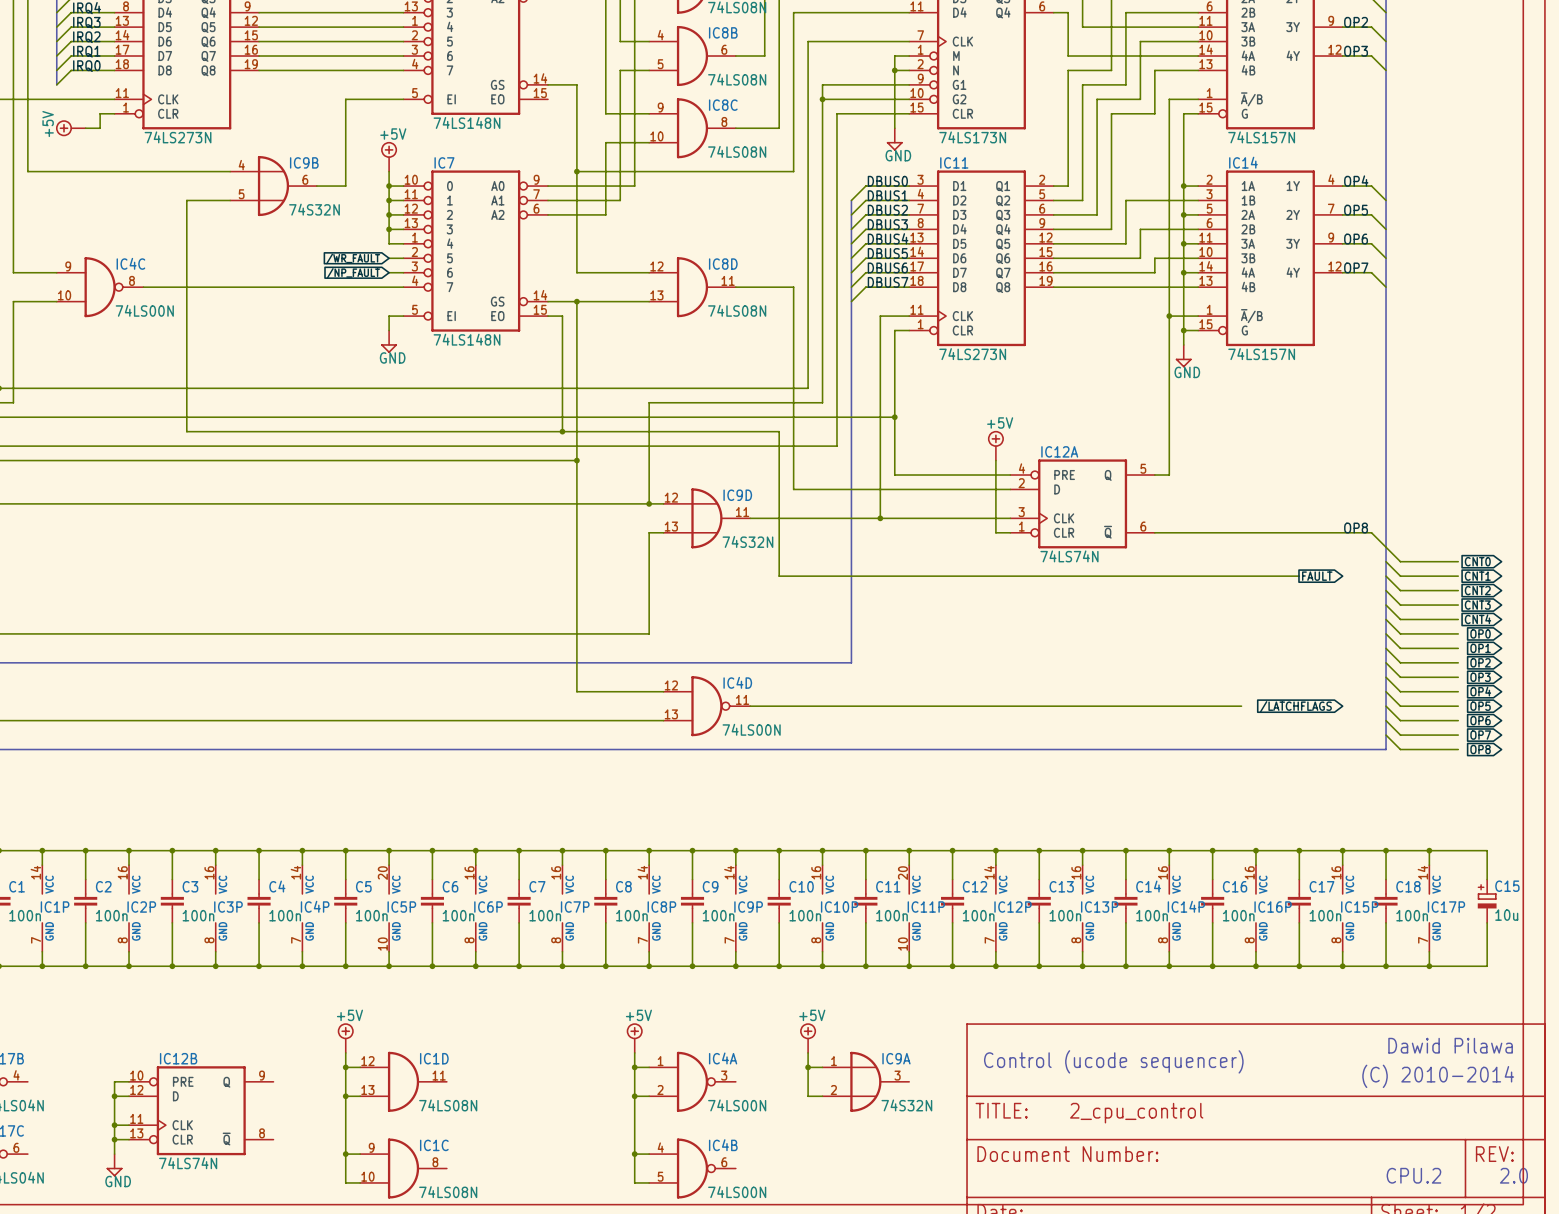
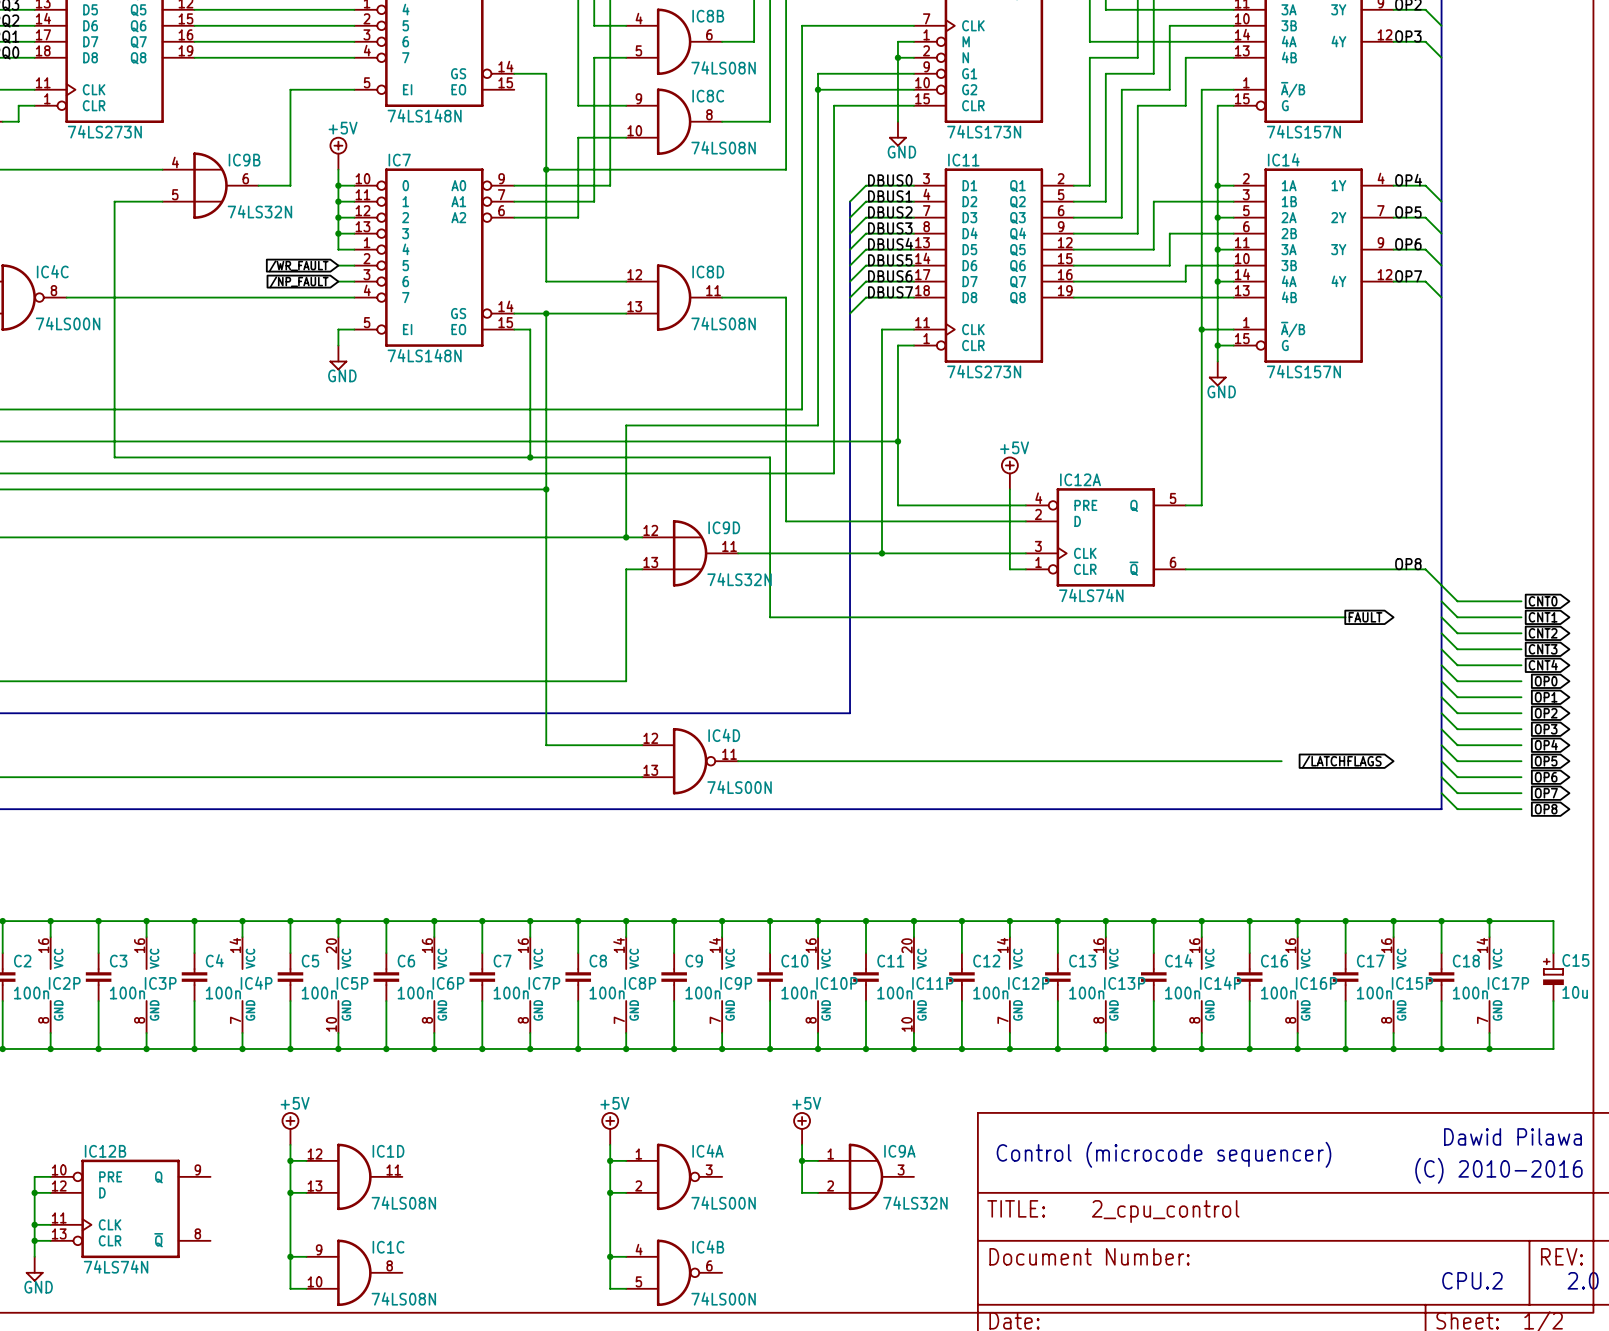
IC9B value: 74S32N (314, 209) -> 74LS32N (259, 211)
IC9D value: 74S32N (747, 541) -> 74LS32N (739, 579)
text: Control (ucode sequencer) (1113, 1061) -> Control (microcode sequencer) (1163, 1154)
text: (C) 2010-2014 (1438, 1076) -> (C) 2010-2016 (1498, 1170)
IC9A value: 74S32N (906, 1105) -> 74LS32N (915, 1203)

